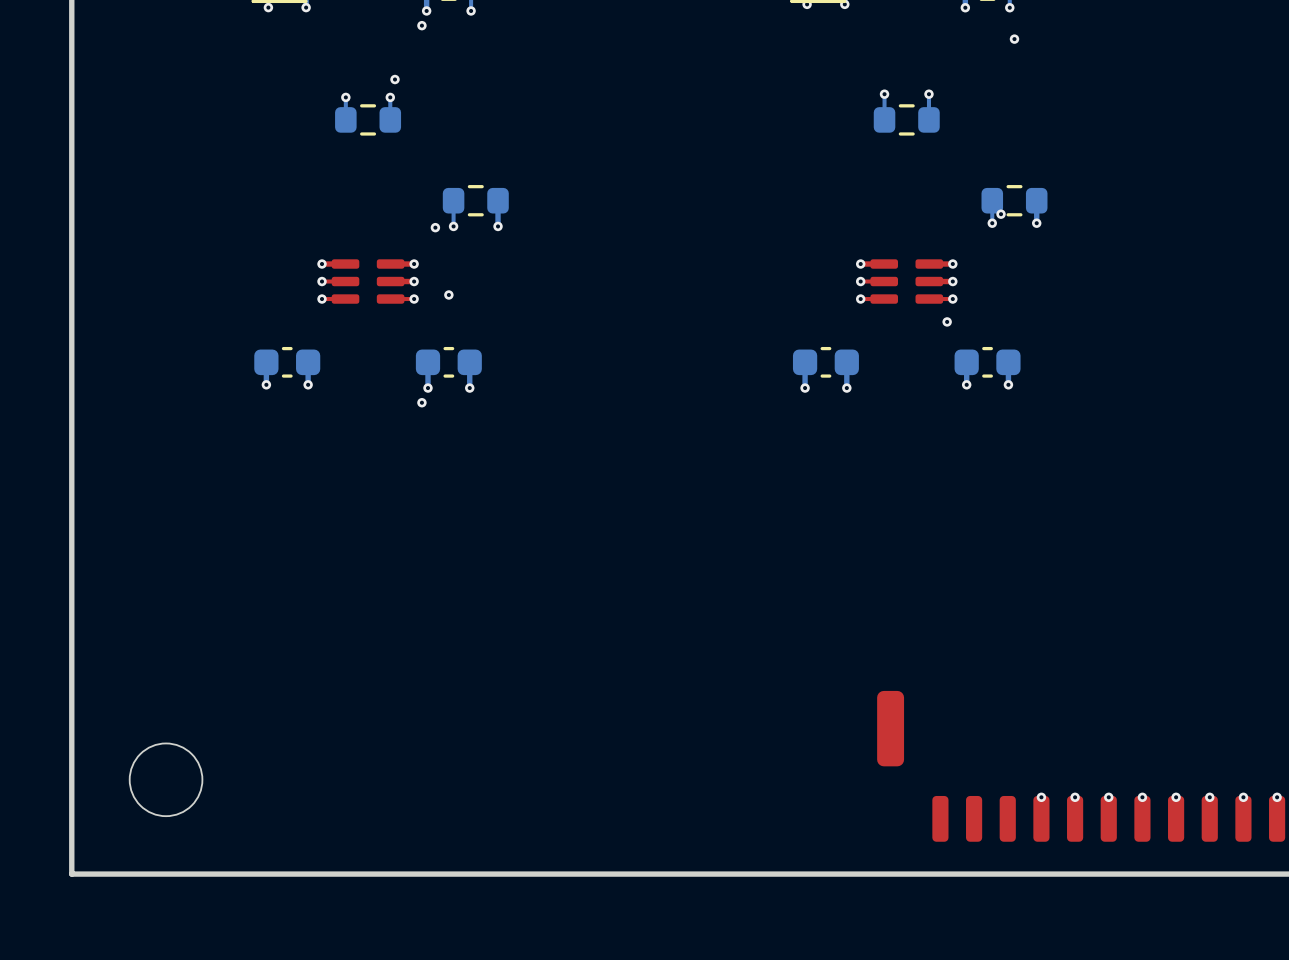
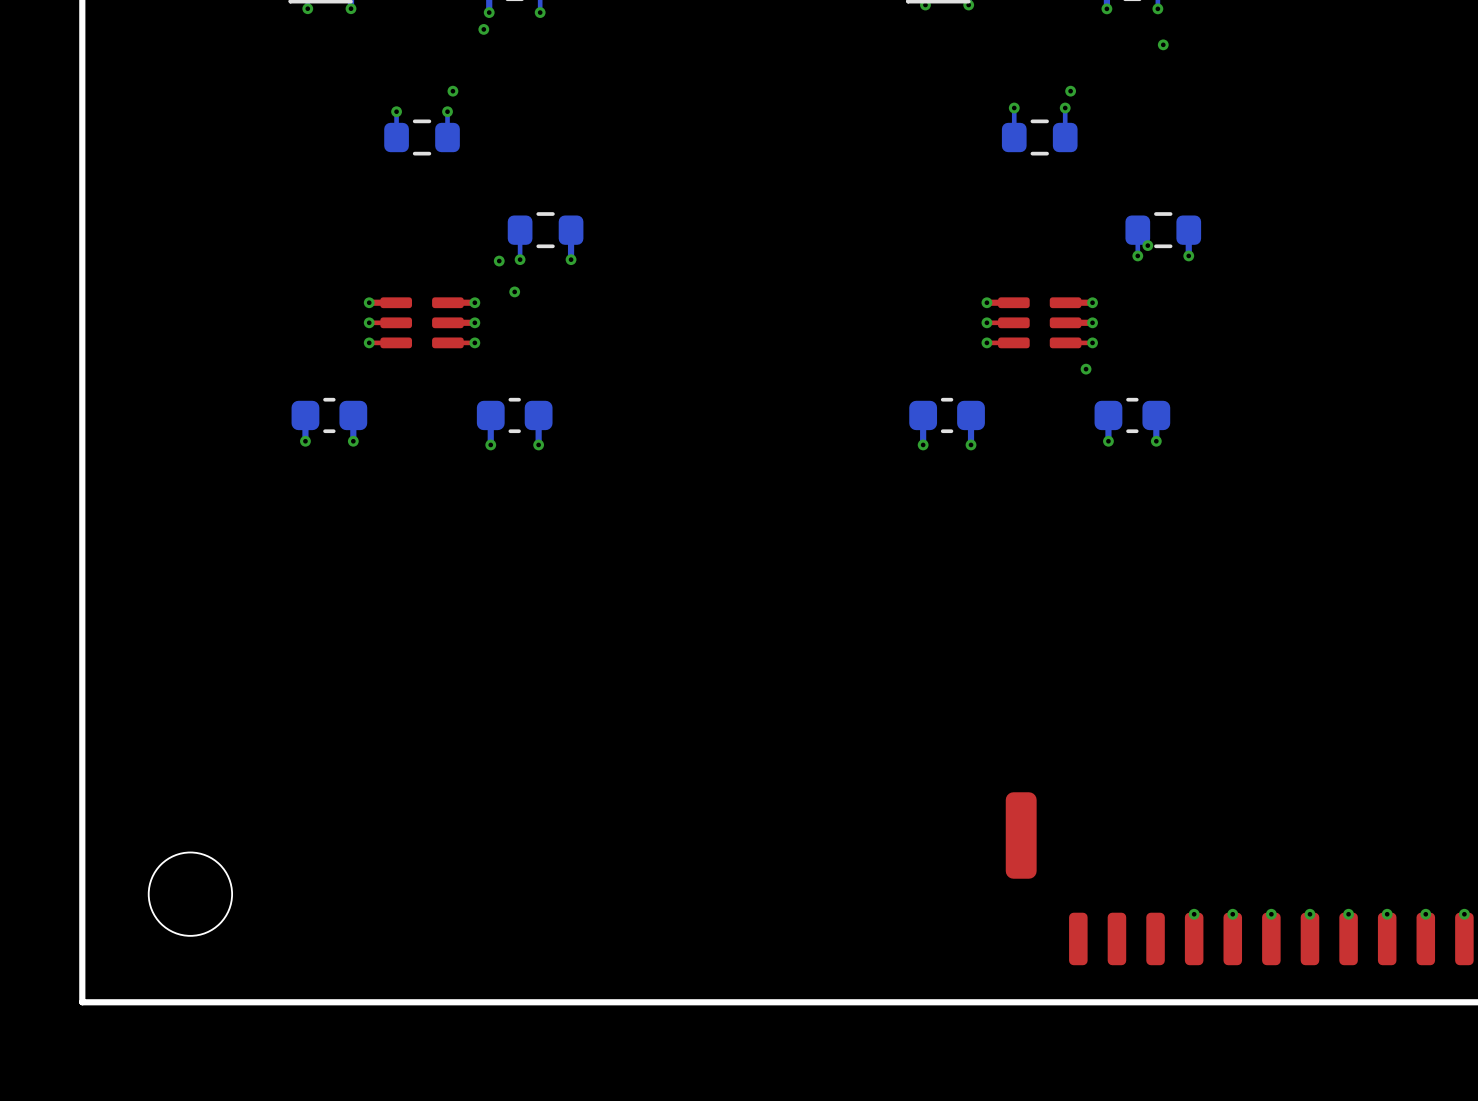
via: none -> (1070, 91)
via position: (448, 294) -> (514, 291)
via: (421, 402) -> none

